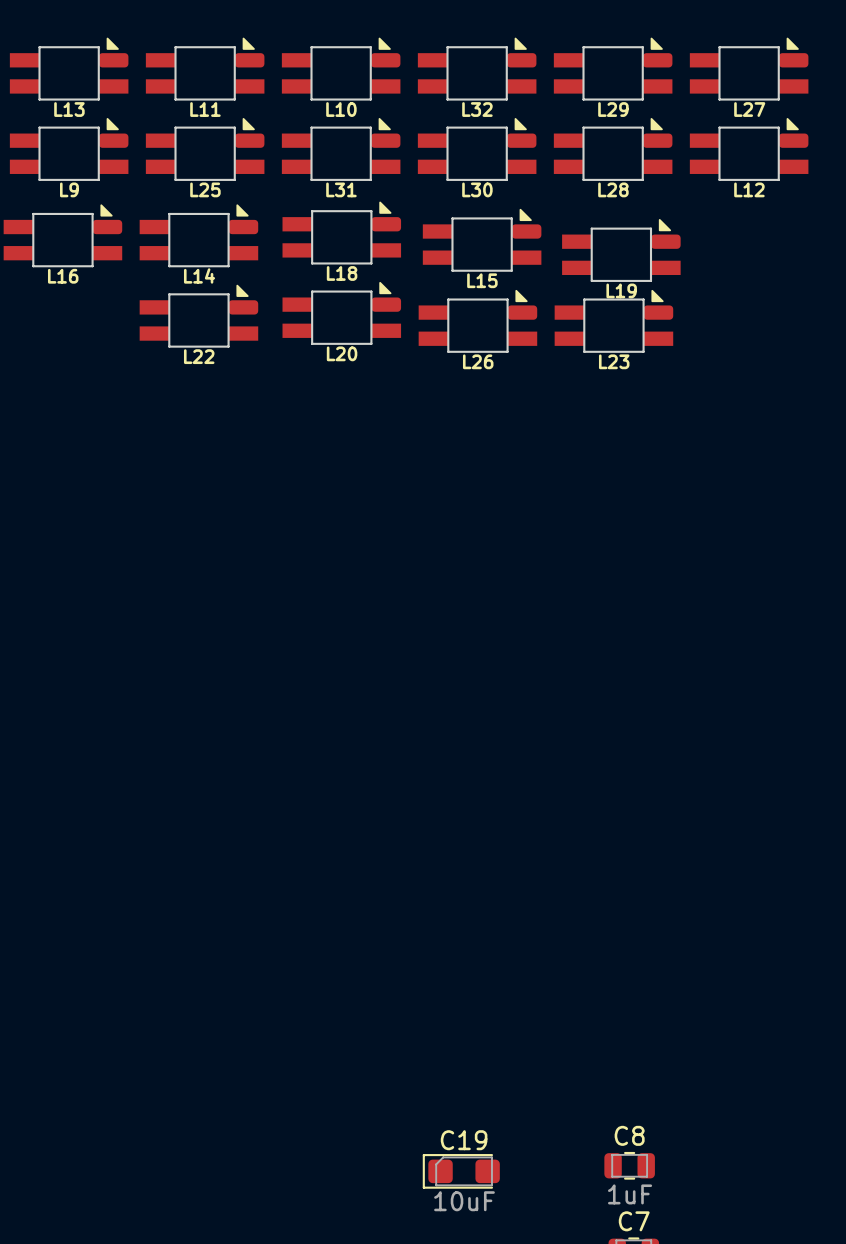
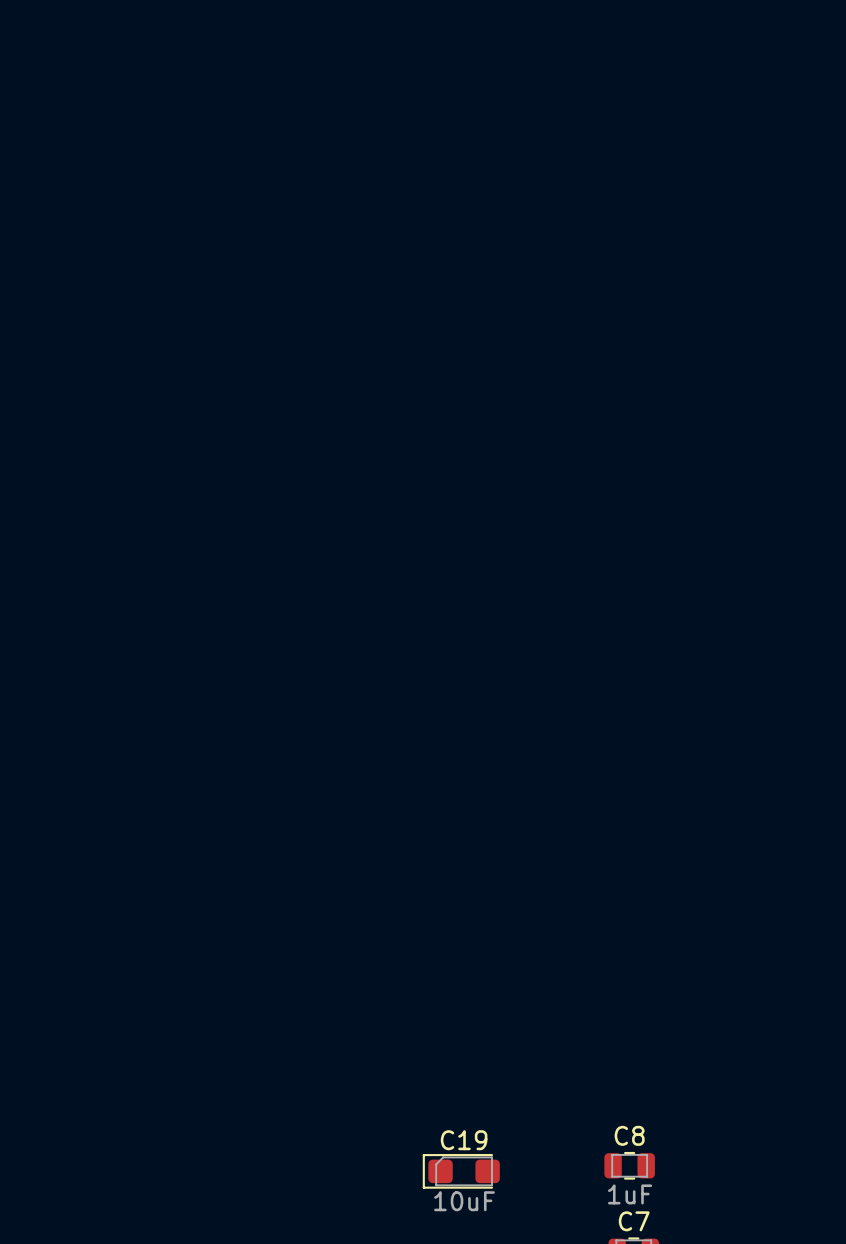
L13: (69, 69) -> none
L11: (205, 69) -> none
L10: (341, 69) -> none
L32: (477, 69) -> none
L29: (613, 69) -> none
L27: (749, 69) -> none
L9: (69, 149) -> none
L25: (205, 149) -> none
L31: (341, 149) -> none
L30: (477, 149) -> none
L28: (613, 149) -> none
L12: (749, 149) -> none
L18: (341, 233) -> none
L16: (62, 235) -> none
L14: (198, 235) -> none
L15: (482, 240) -> none
L19: (621, 250) -> none
L20: (341, 313) -> none
L22: (198, 316) -> none
L26: (477, 321) -> none
L23: (613, 321) -> none

